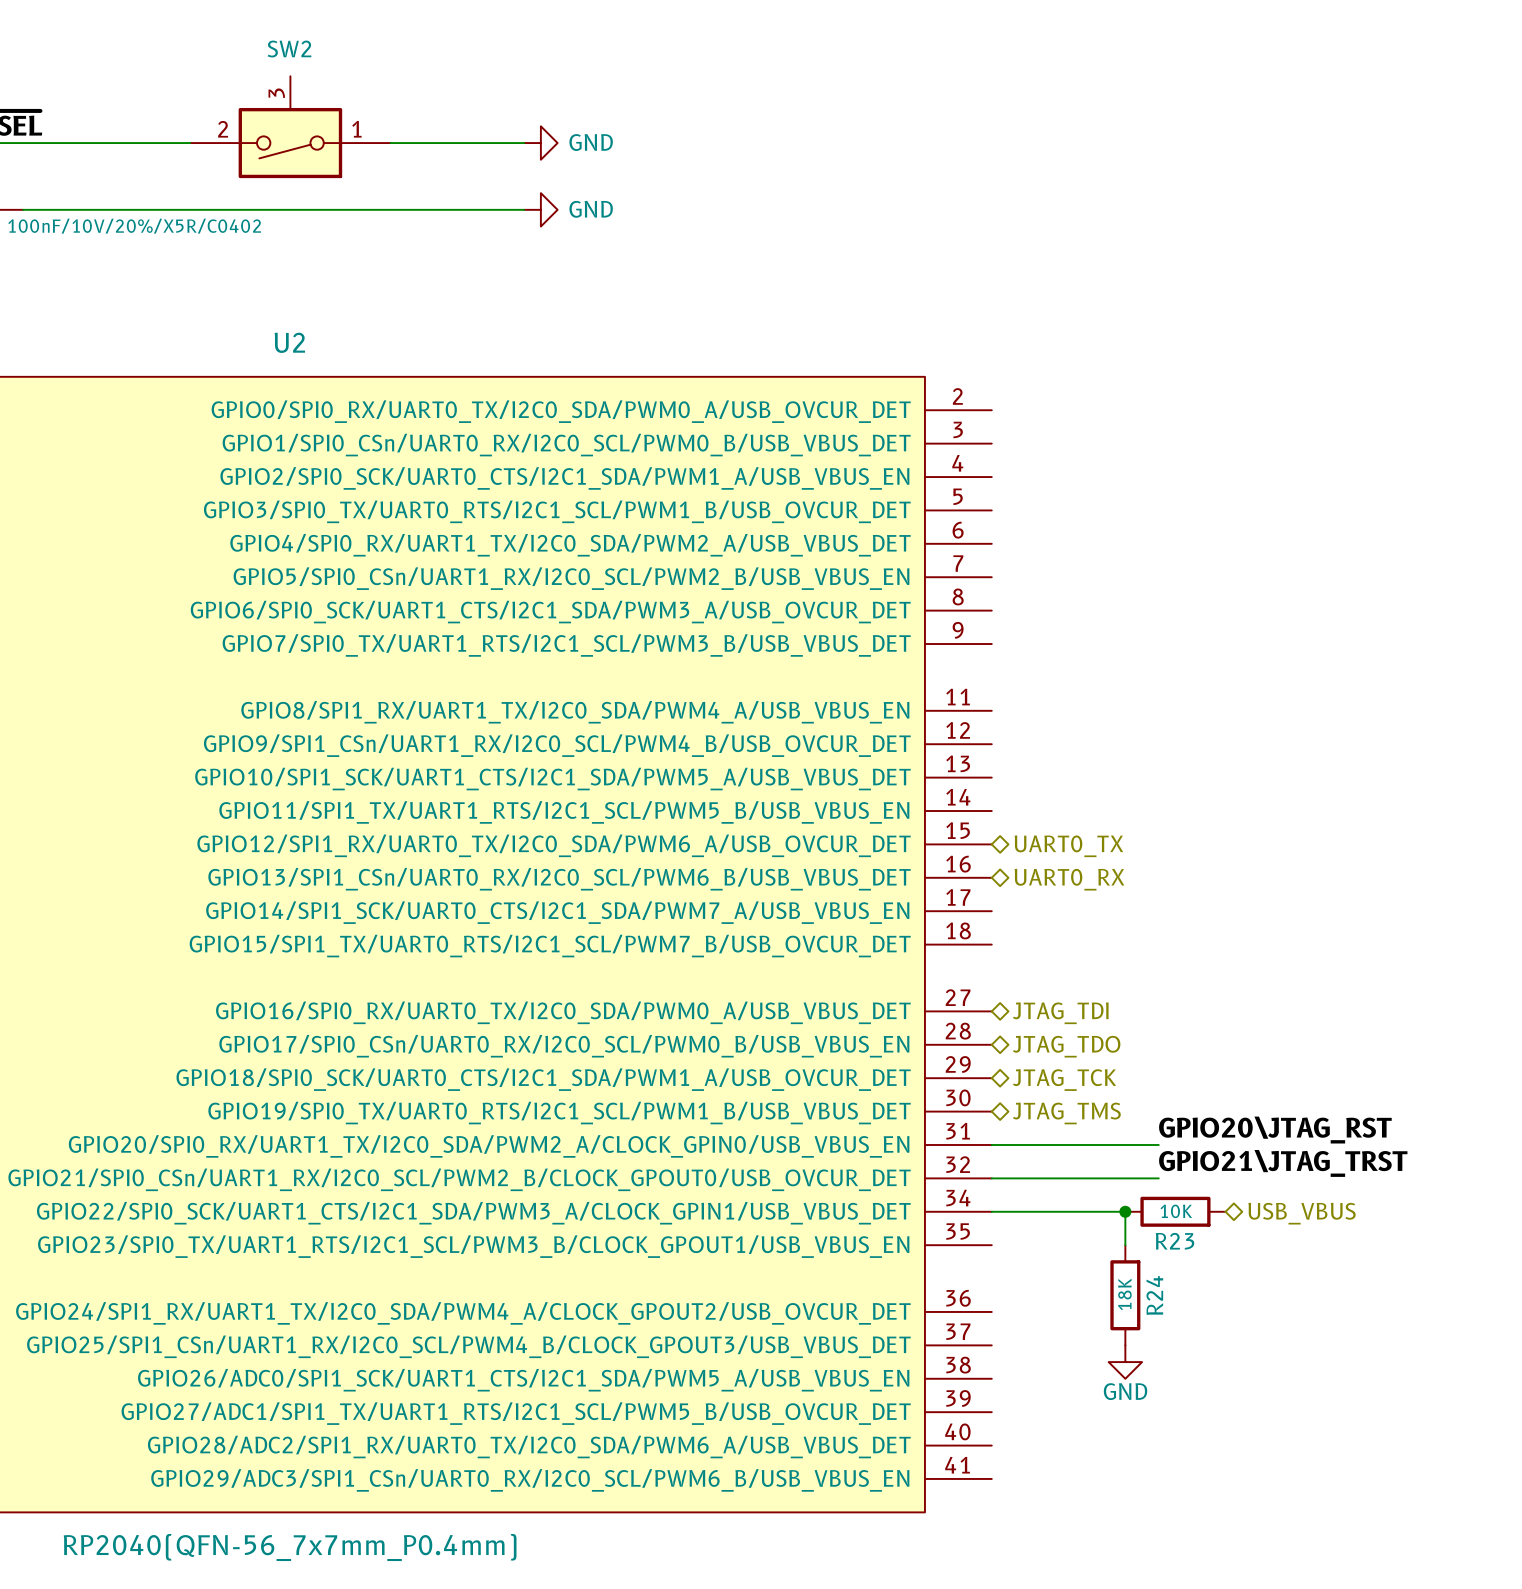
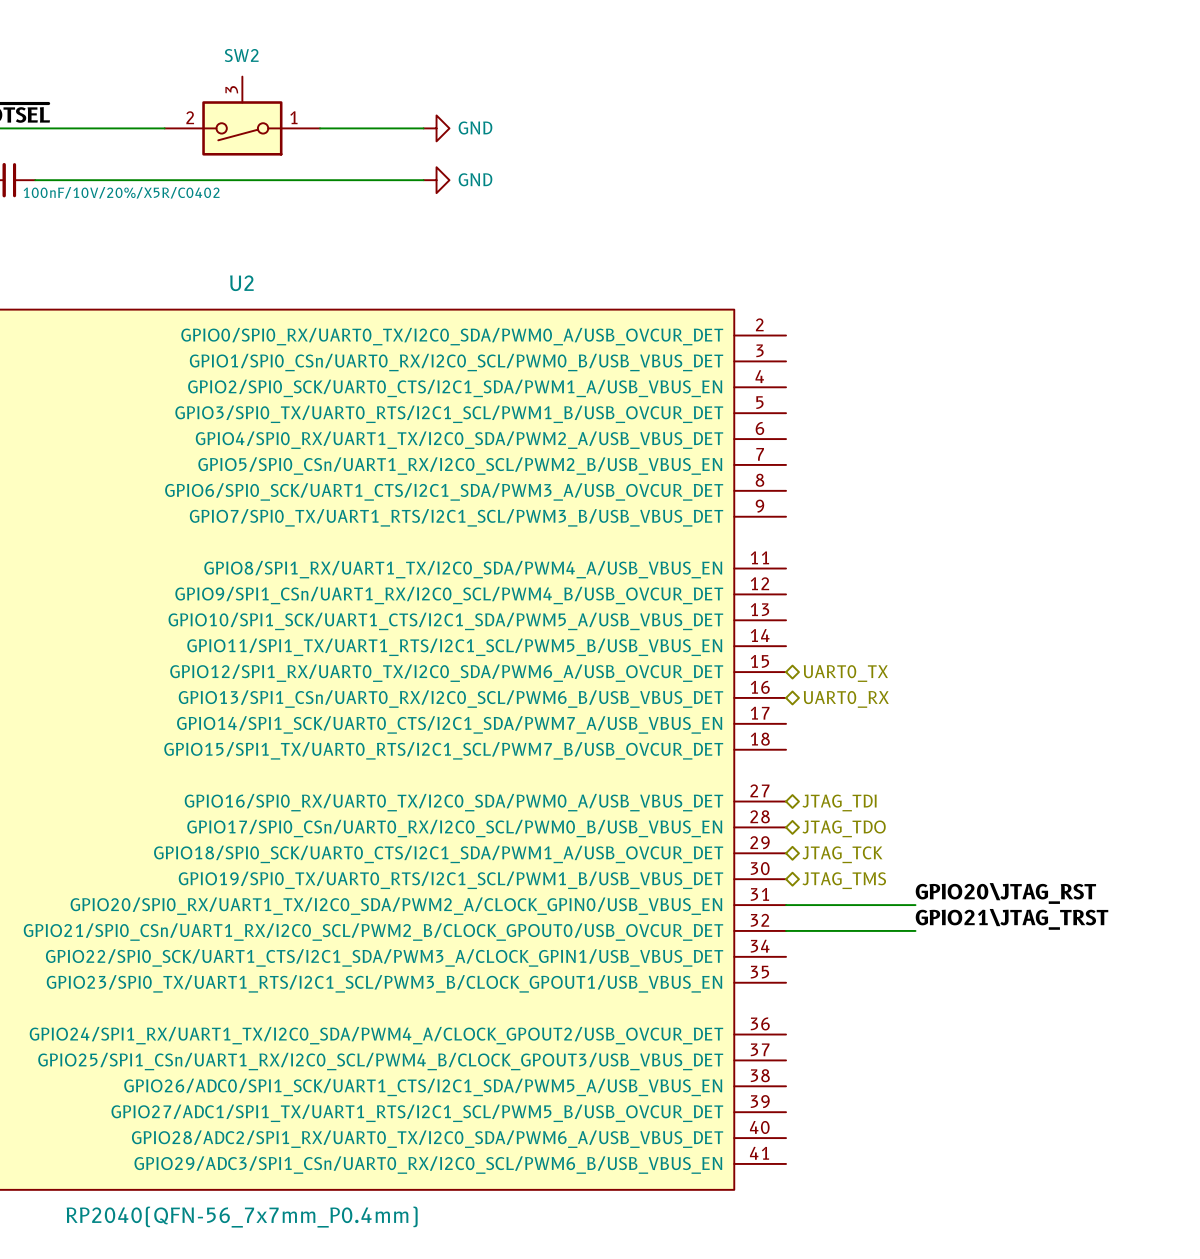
wire: (991, 1211) (1125, 1211) (1125, 1245) -> none
junction: (1125, 1211) -> none
R23: 10K (1175, 1211) -> none
hierarchical label: USB_VBUS (1302, 1213) -> none
R24: 18K (1125, 1295) -> none
power symbol: GND (1125, 1362) -> none

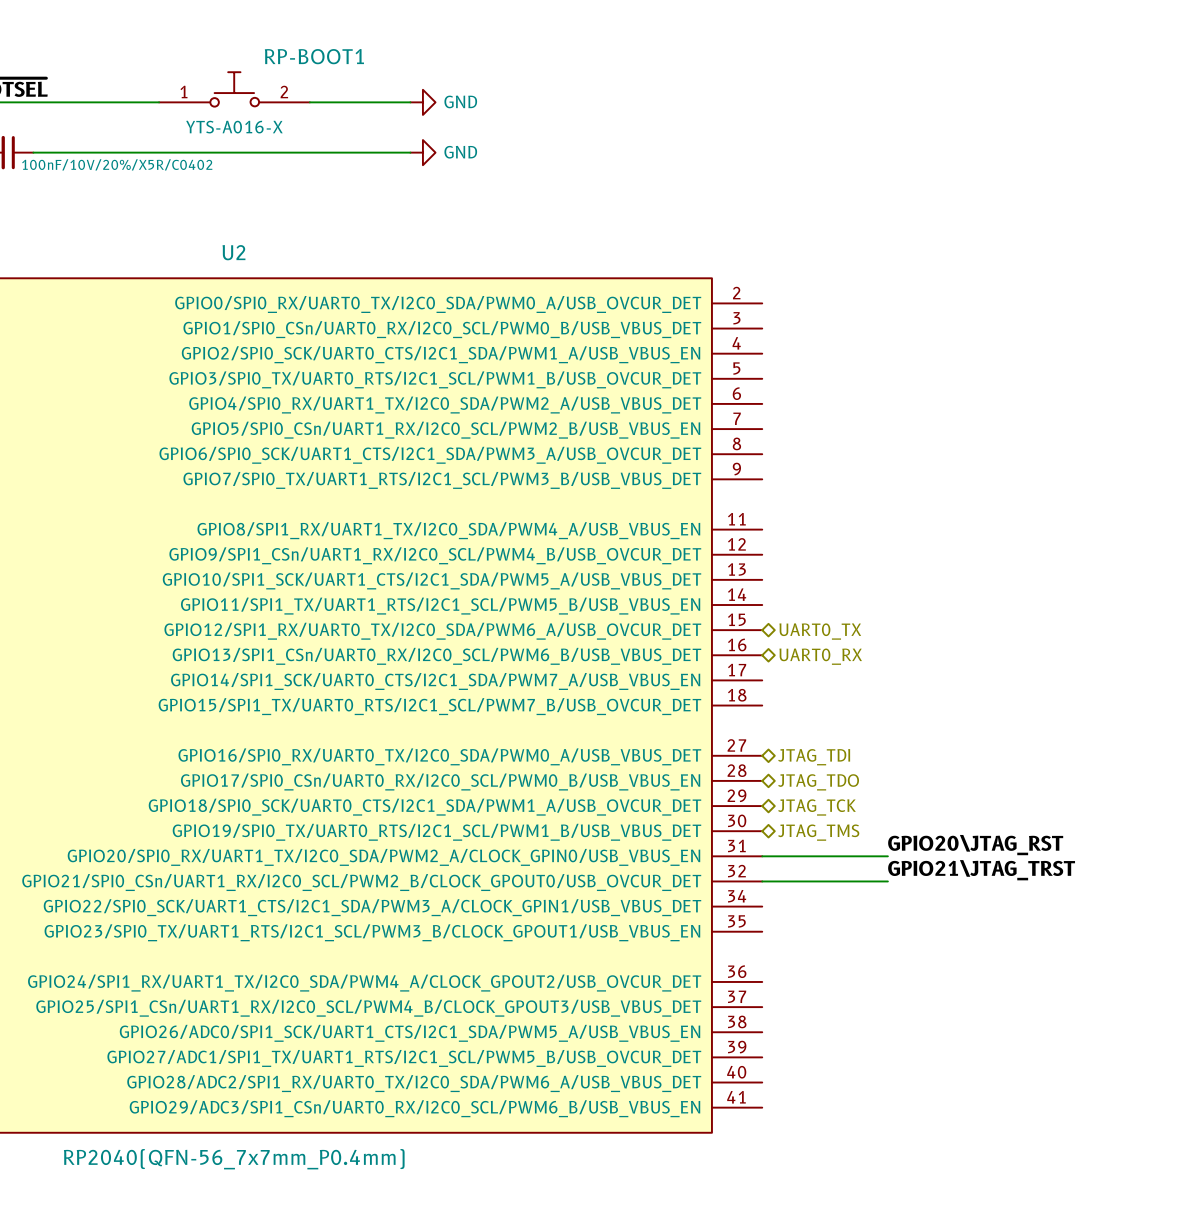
RP-BOOT1: none -> YTS-A016-X (234, 89)
SW2: (242, 116) -> none

